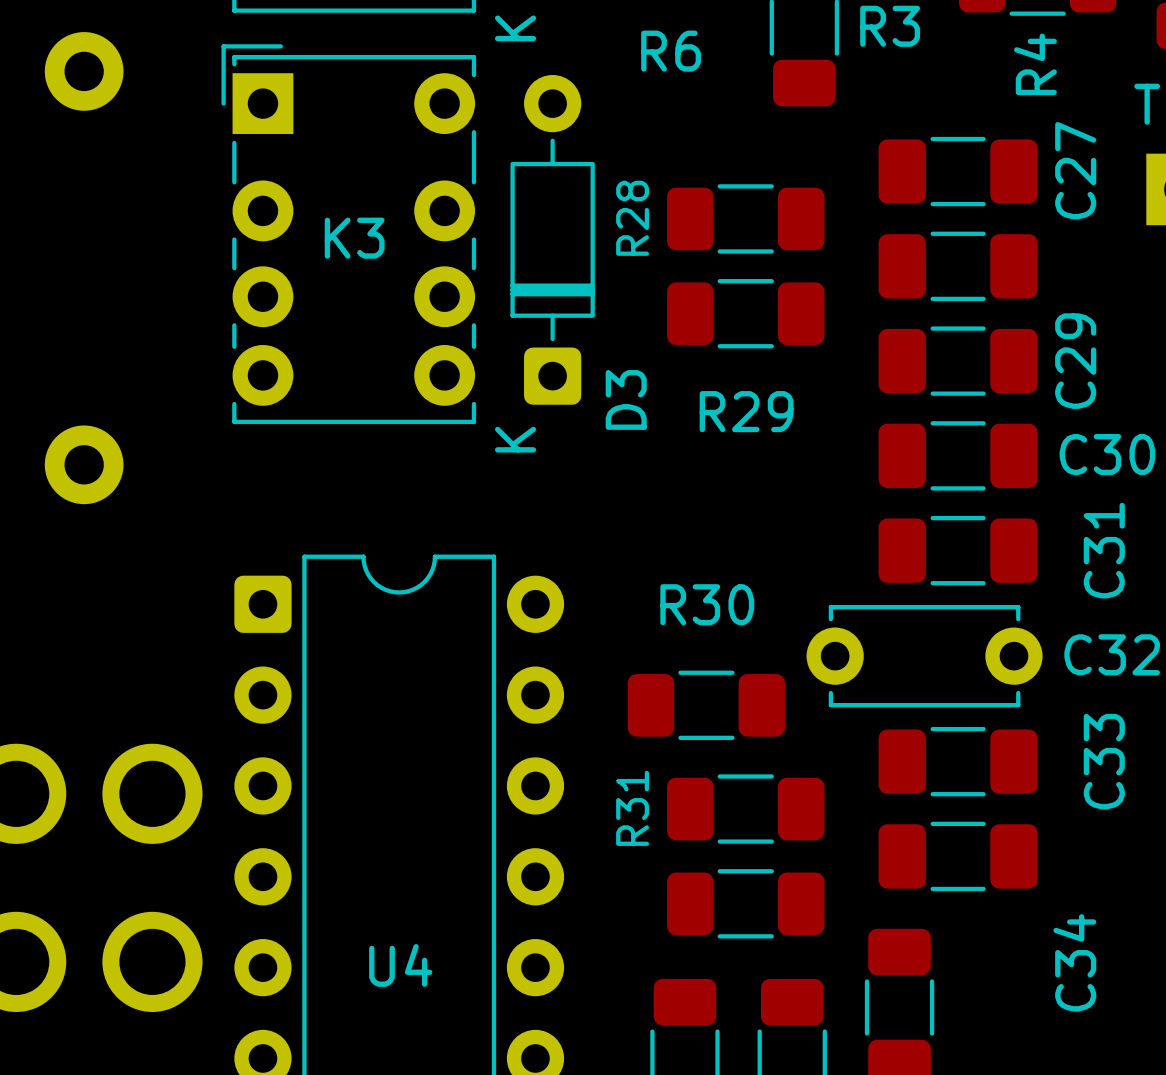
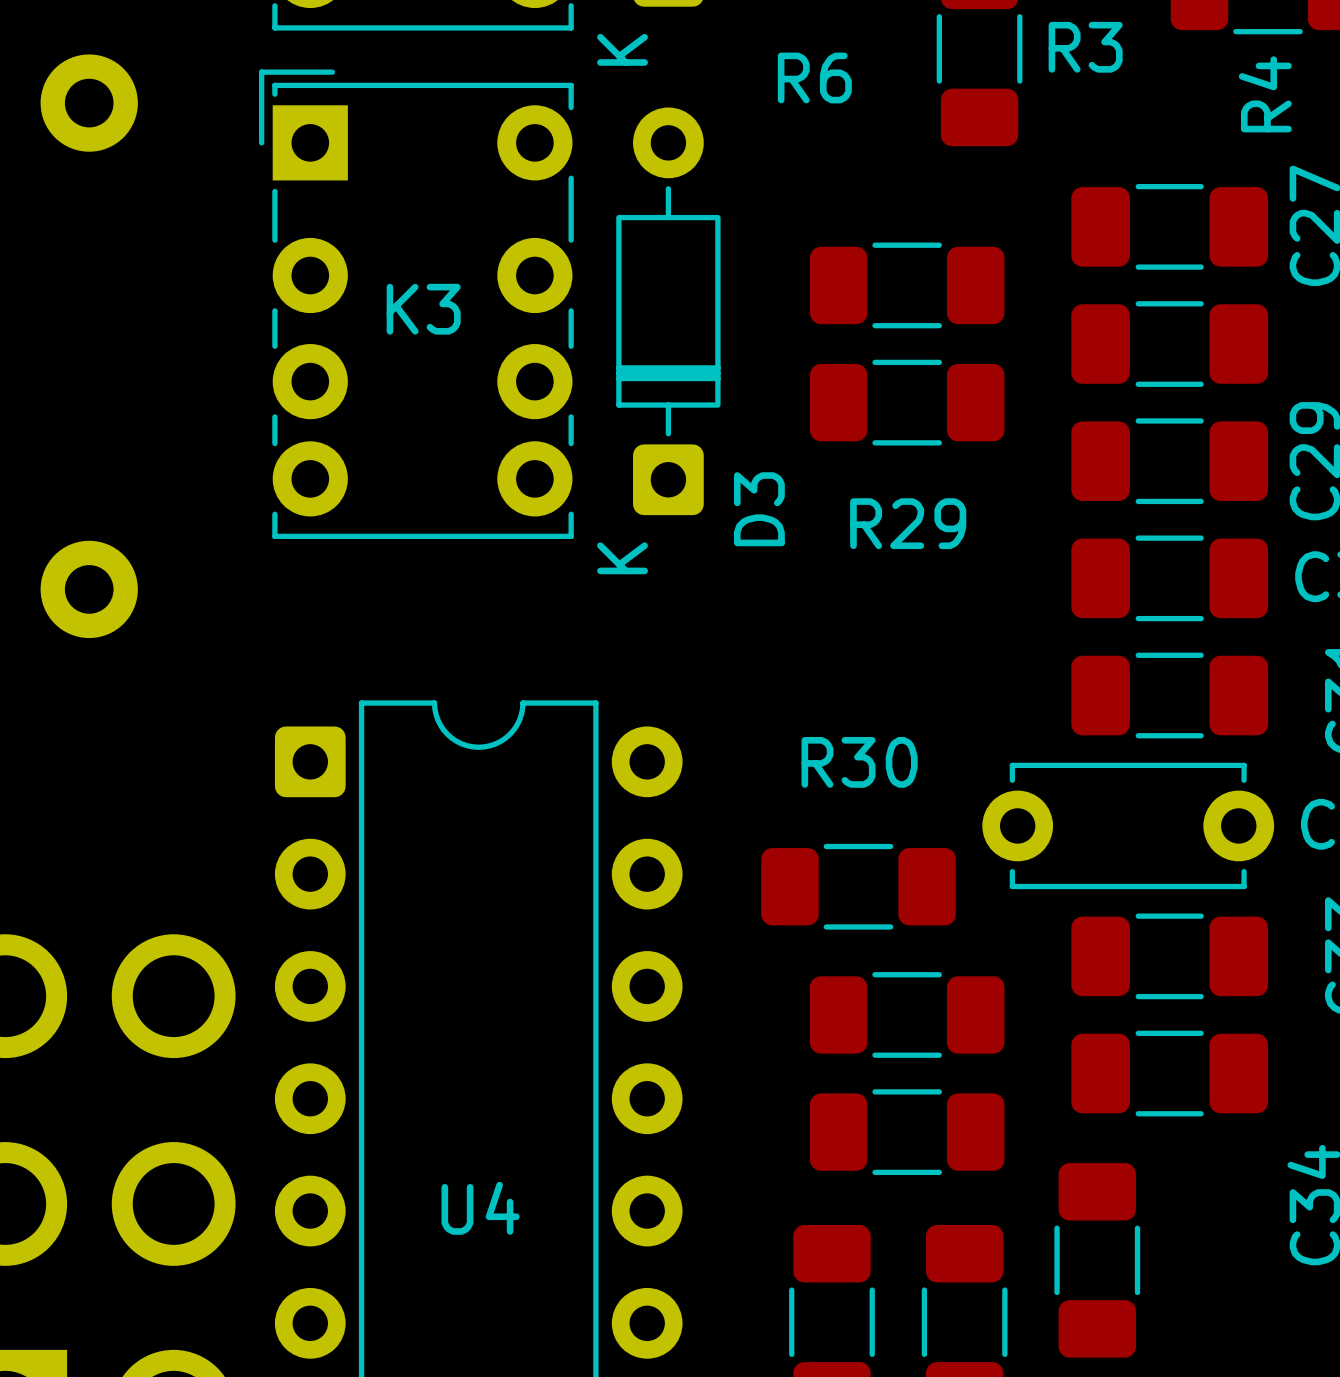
R28 name: R28 (632, 218) -> none
R31 name: R31 (632, 808) -> none

